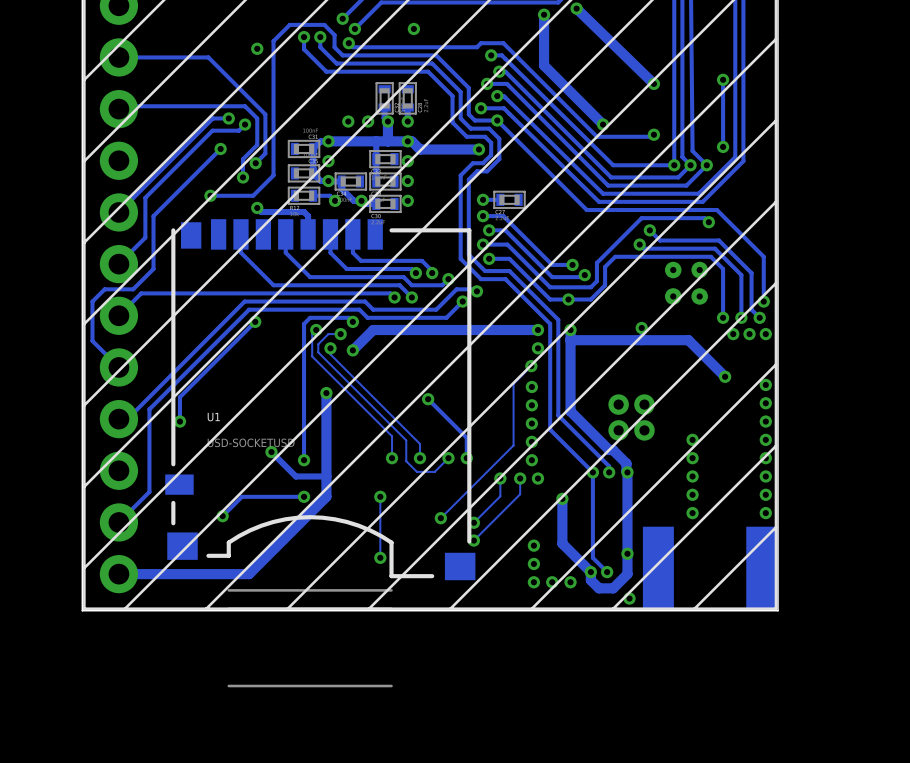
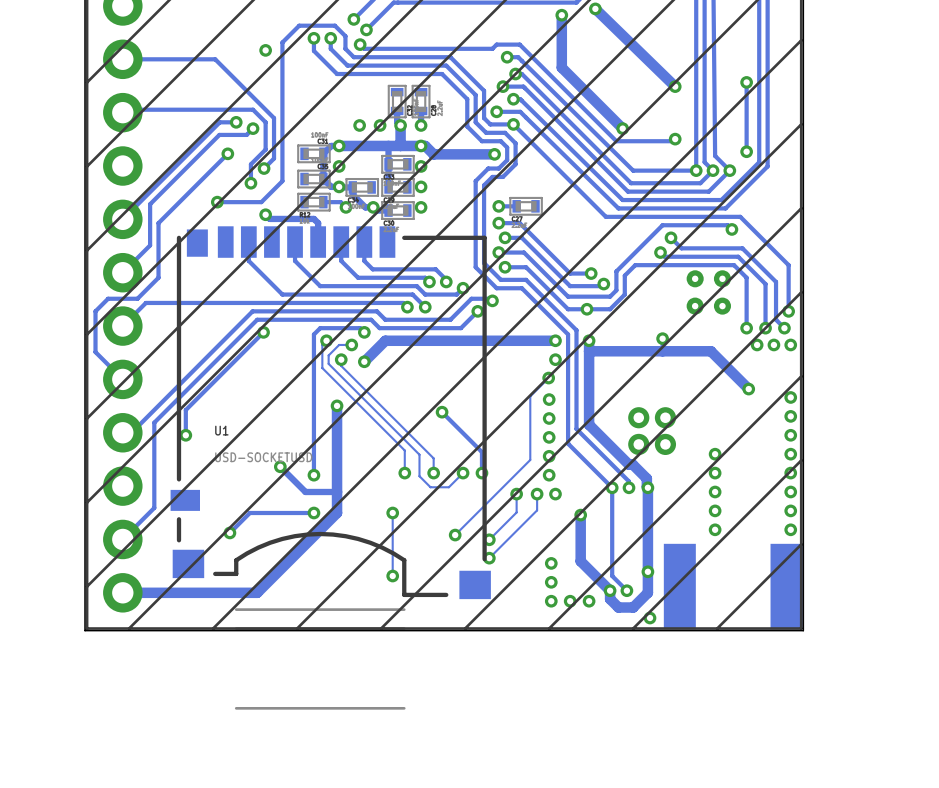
via: (413, 28) -> none

